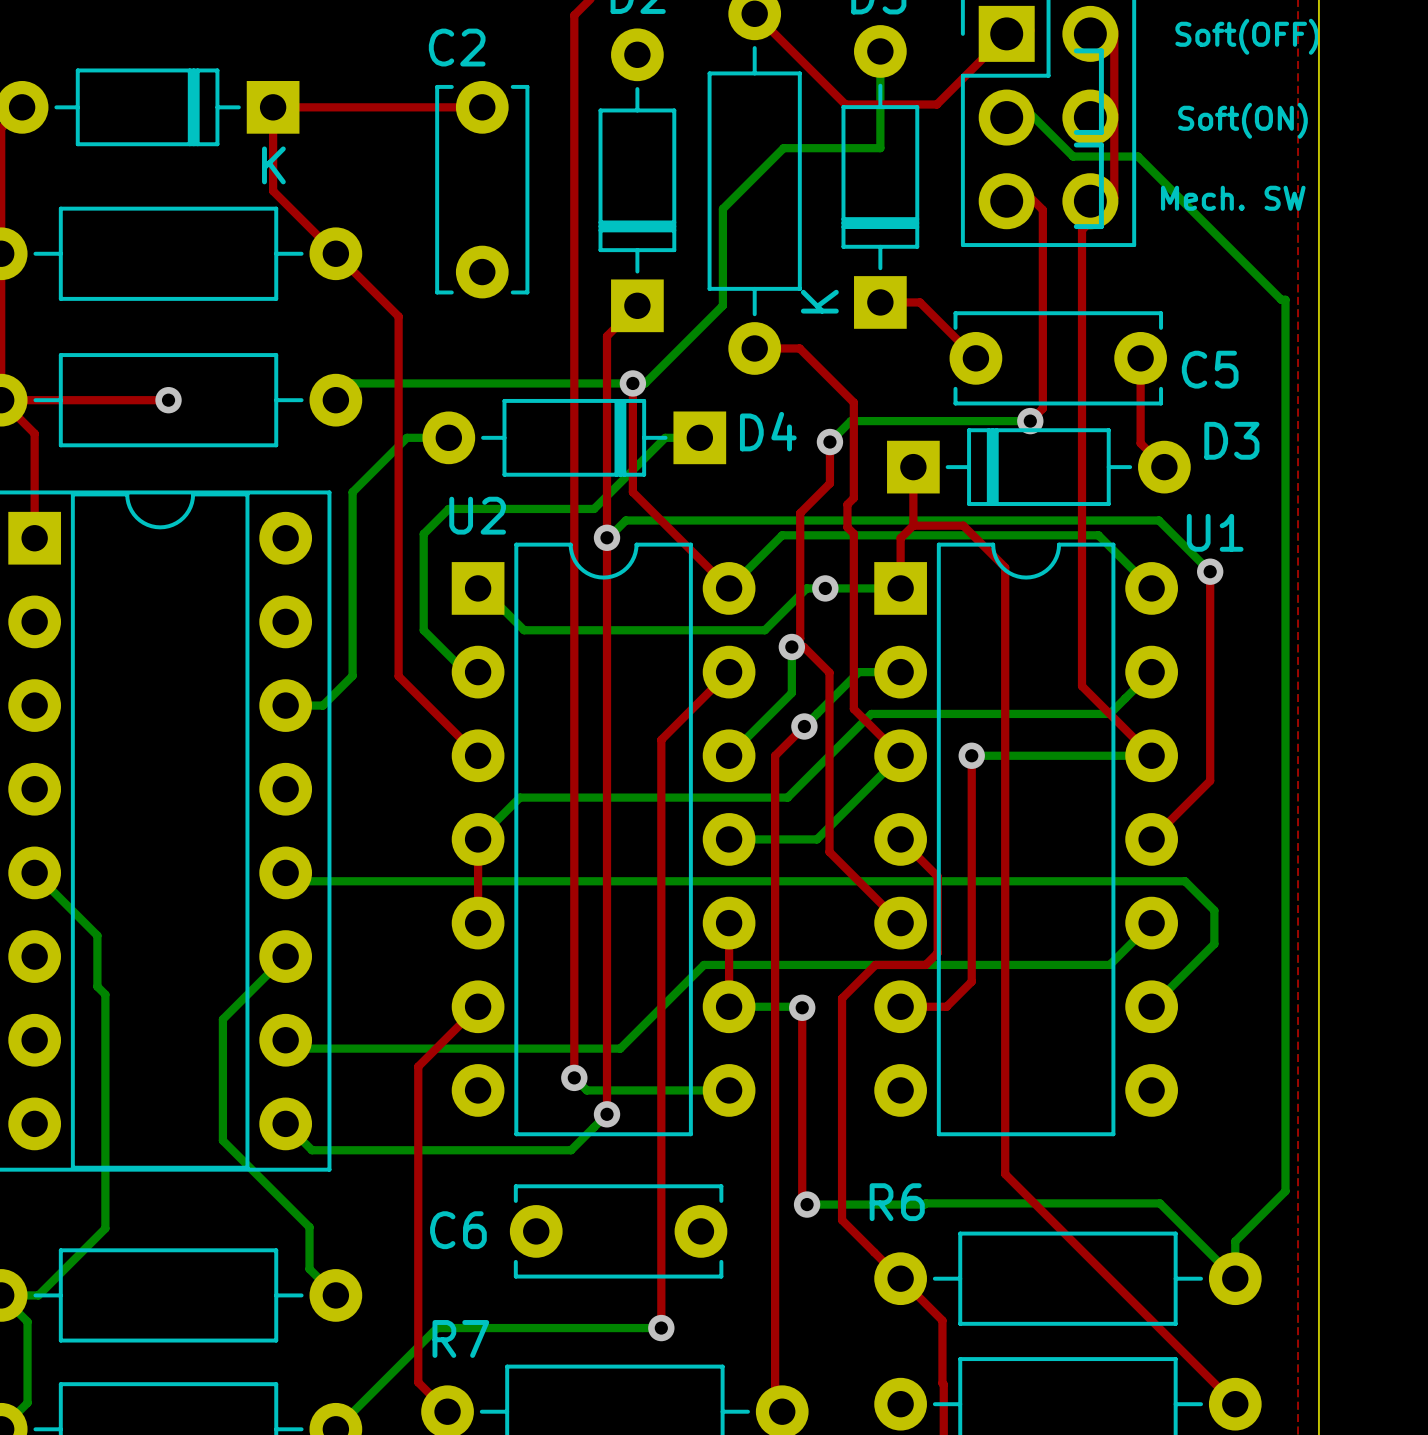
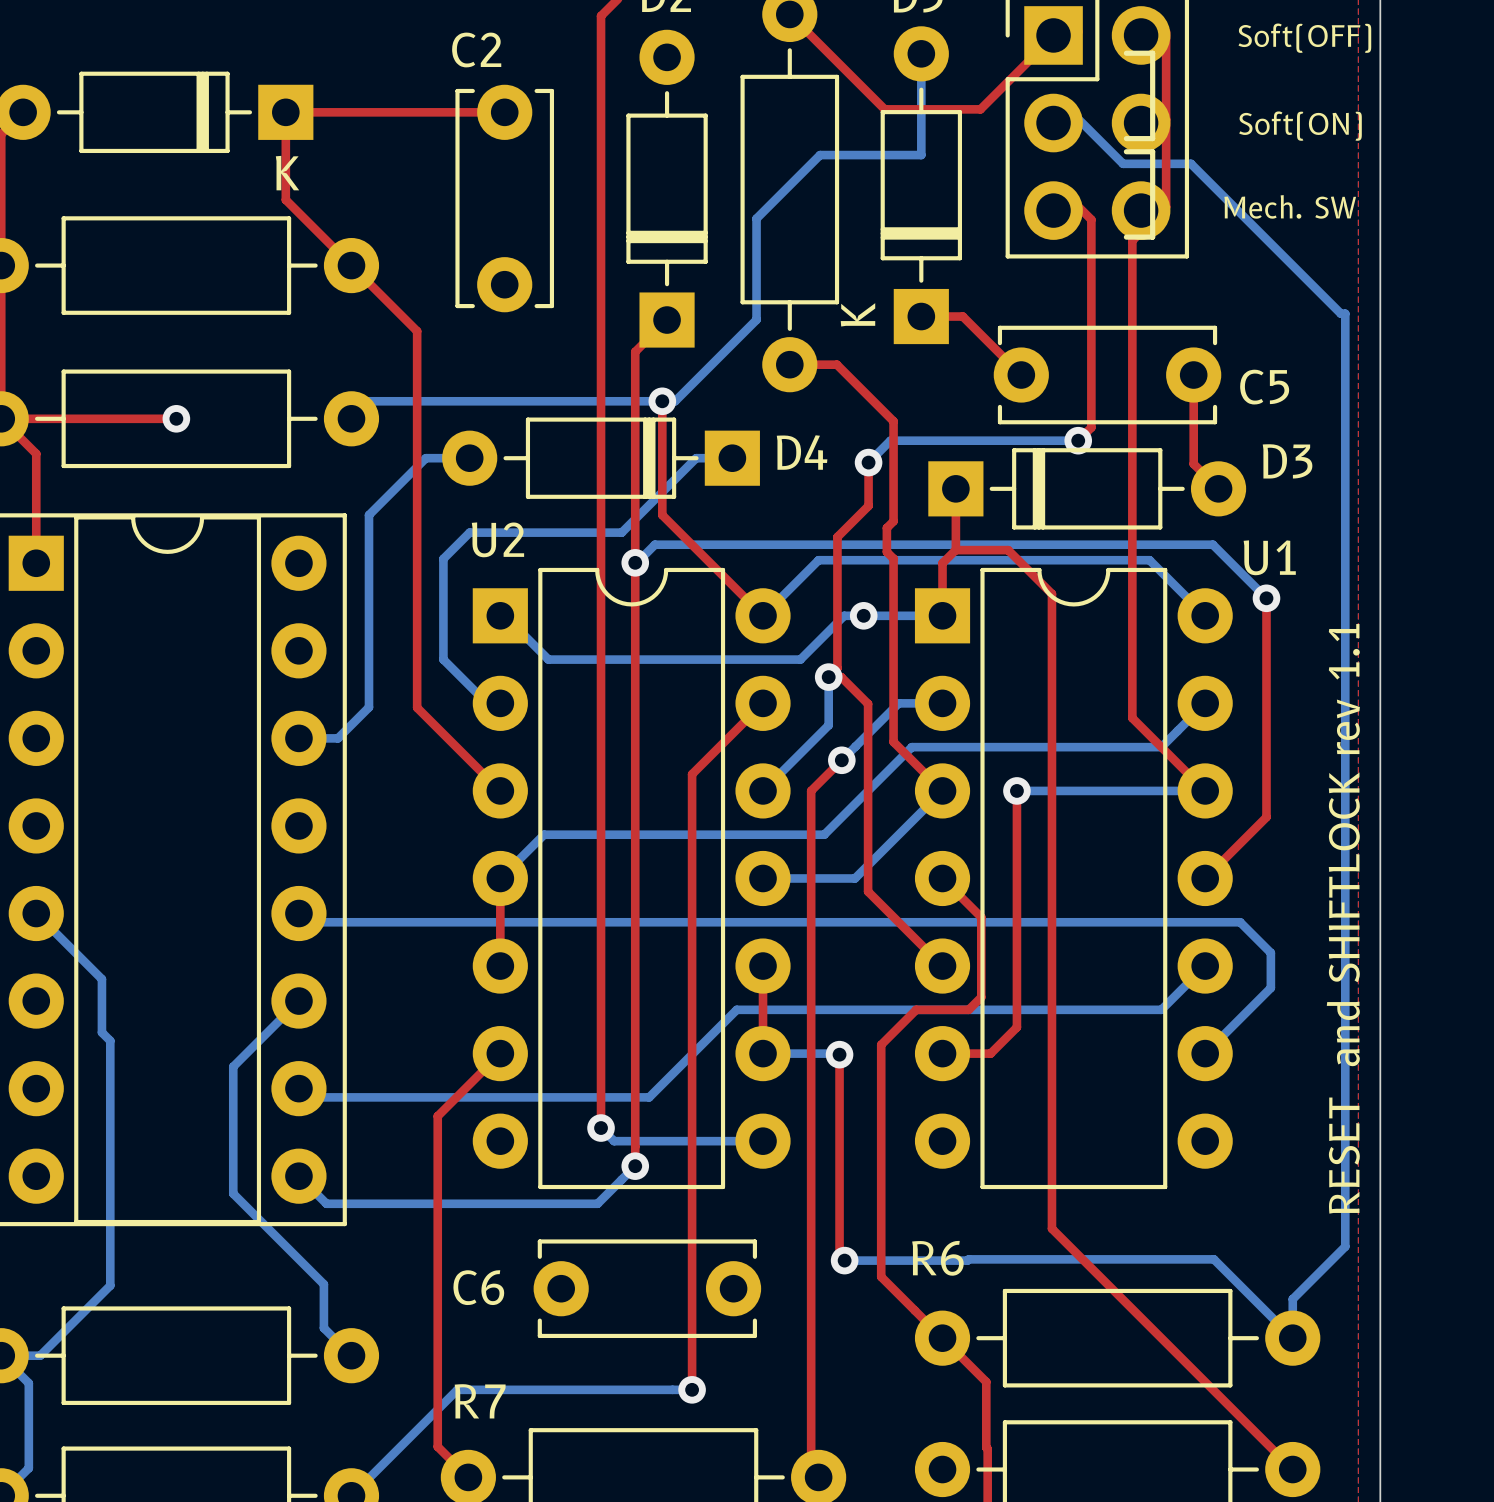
text: none -> RESET and SHIFTLOCK rev 1.1 (1343, 918)

